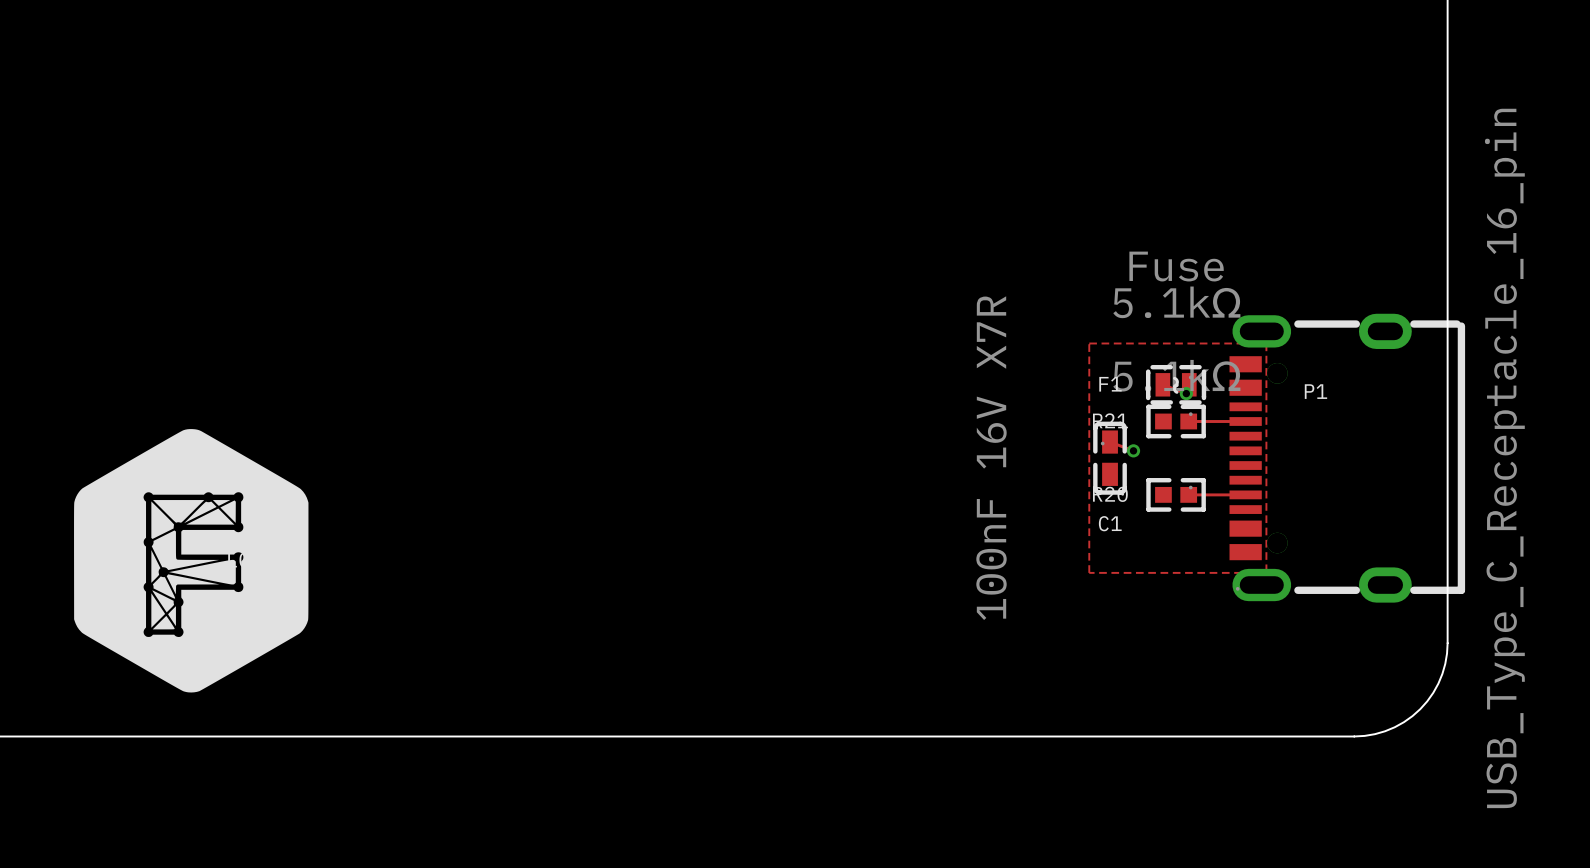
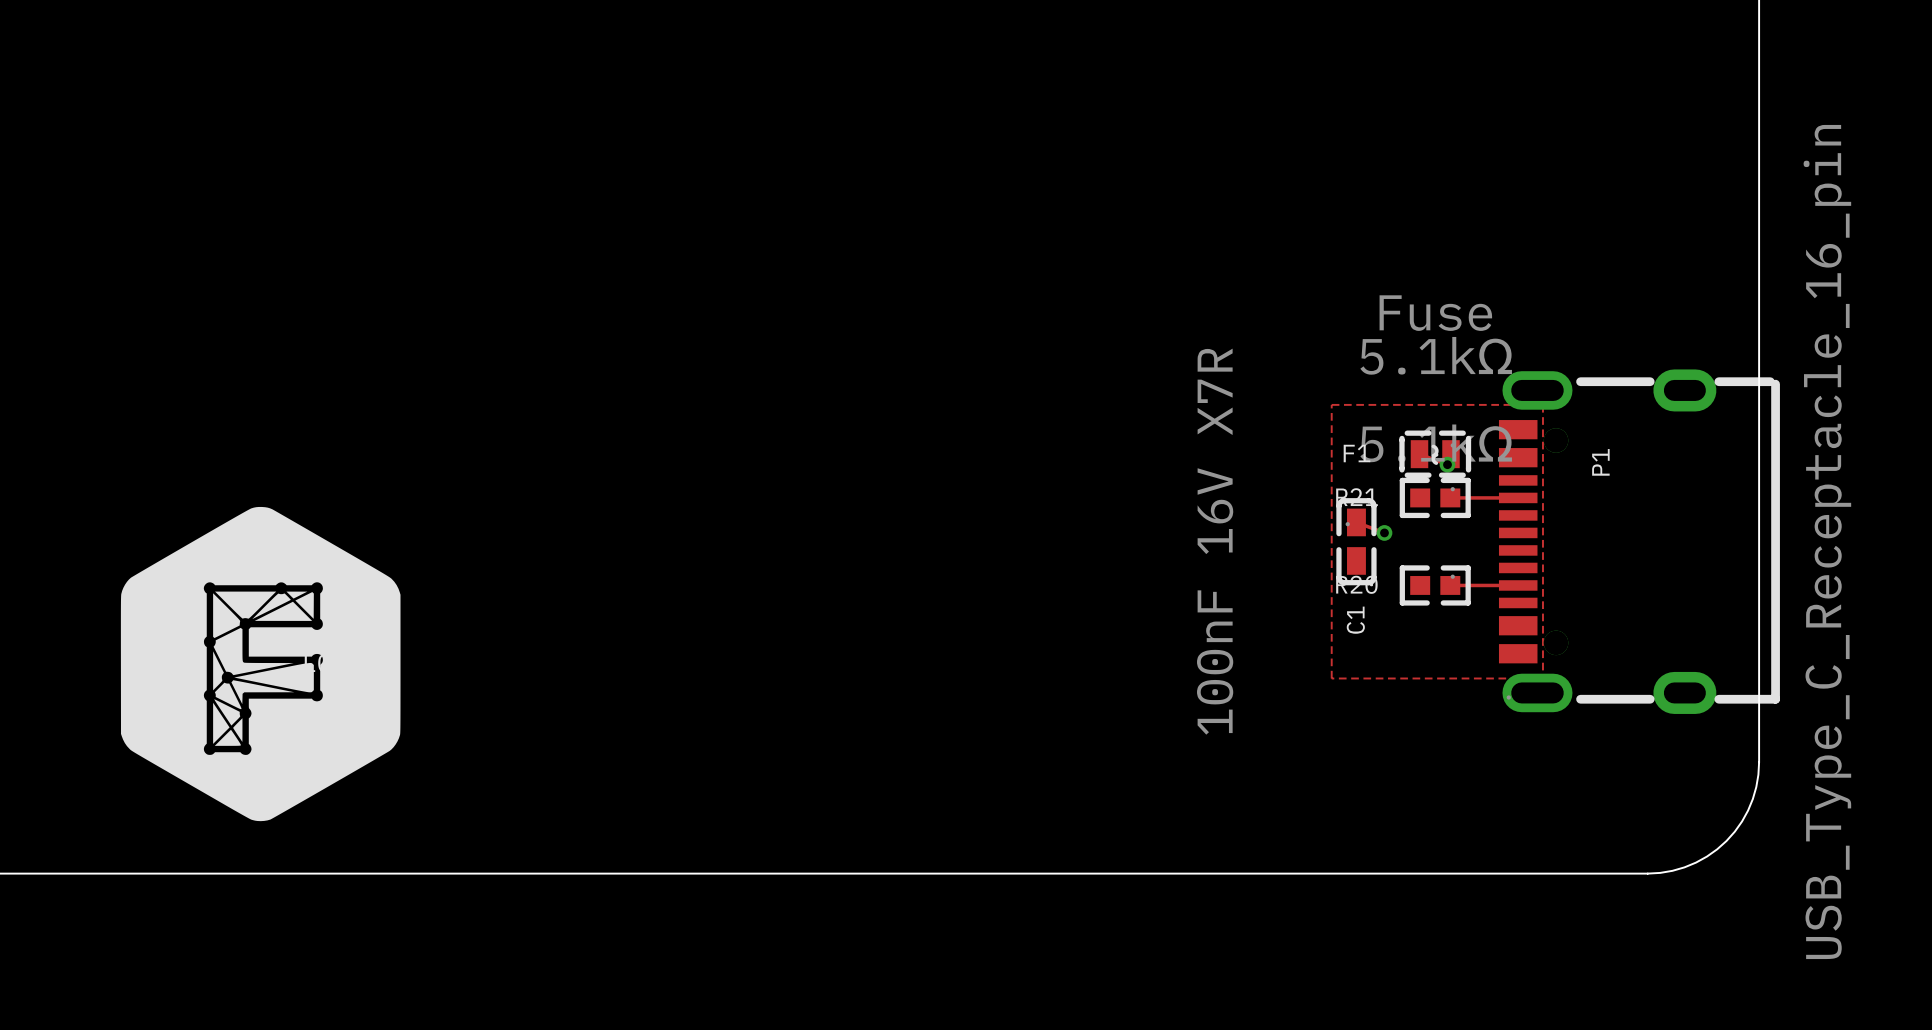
P1 name rotation: 0° (1315, 391) -> 90° counterclockwise (1600, 462)
C1 name rotation: 0° (1110, 523) -> 90° counterclockwise (1355, 620)

